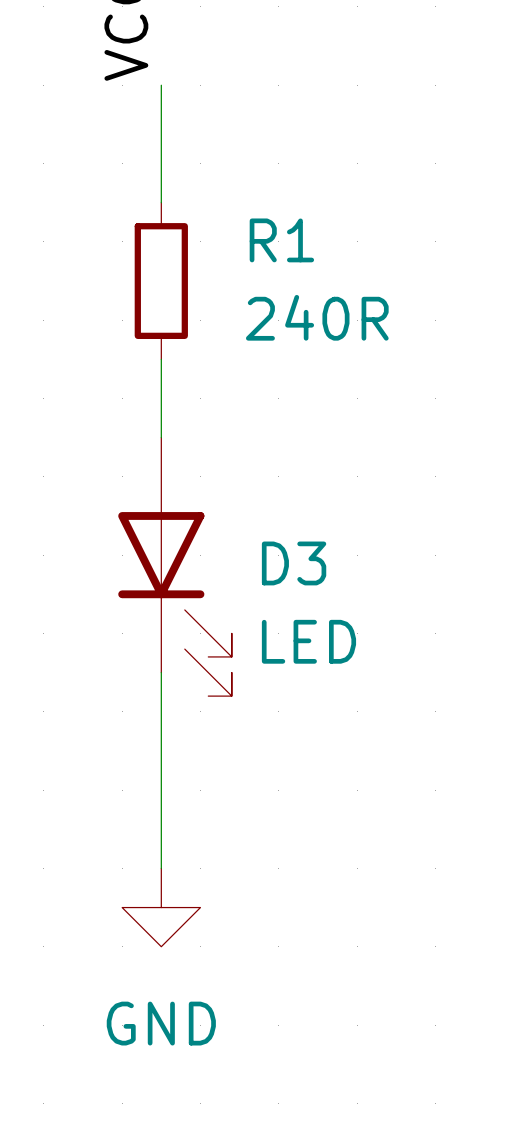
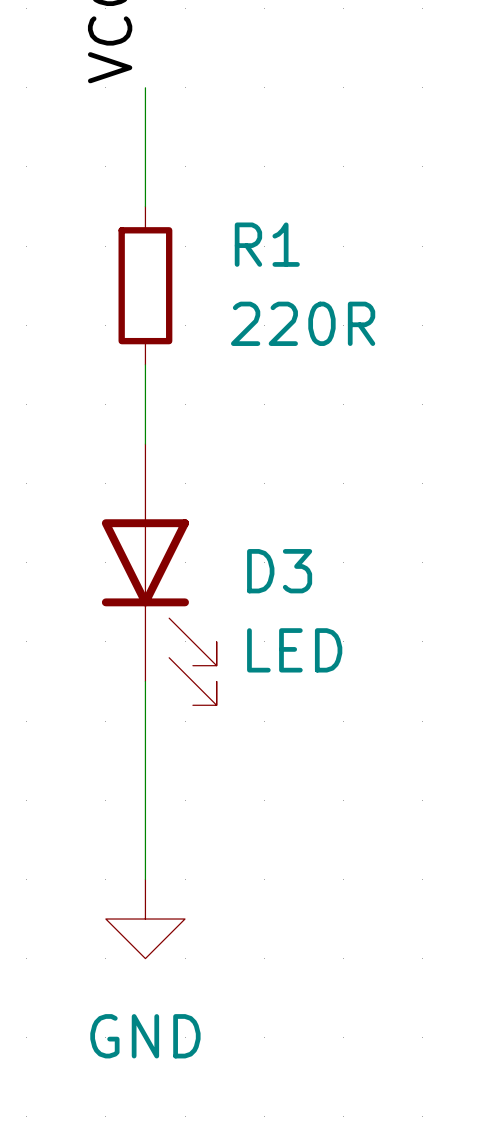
R1 value: 240R (317, 317) -> 220R (303, 323)

